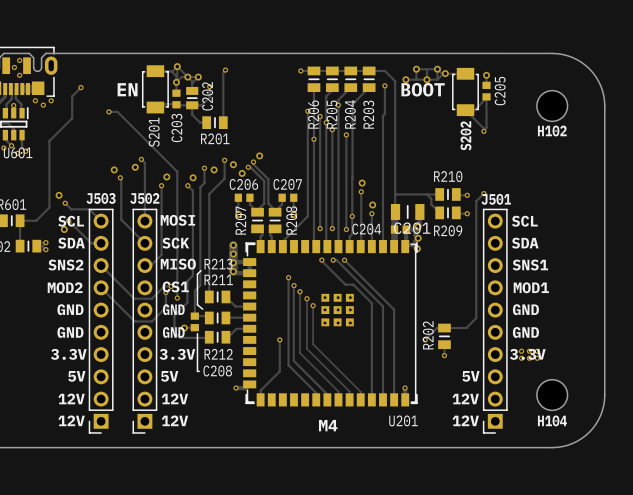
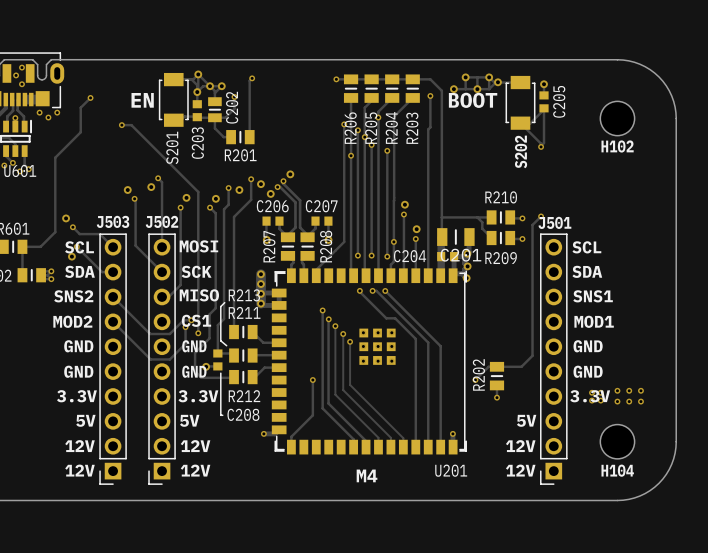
via: none -> (617, 390)
via: none -> (629, 390)
via: none -> (640, 390)
via: (521, 351) -> none
via: (521, 358) -> none
via: none -> (617, 401)
via: none -> (629, 401)
via: none -> (640, 401)

